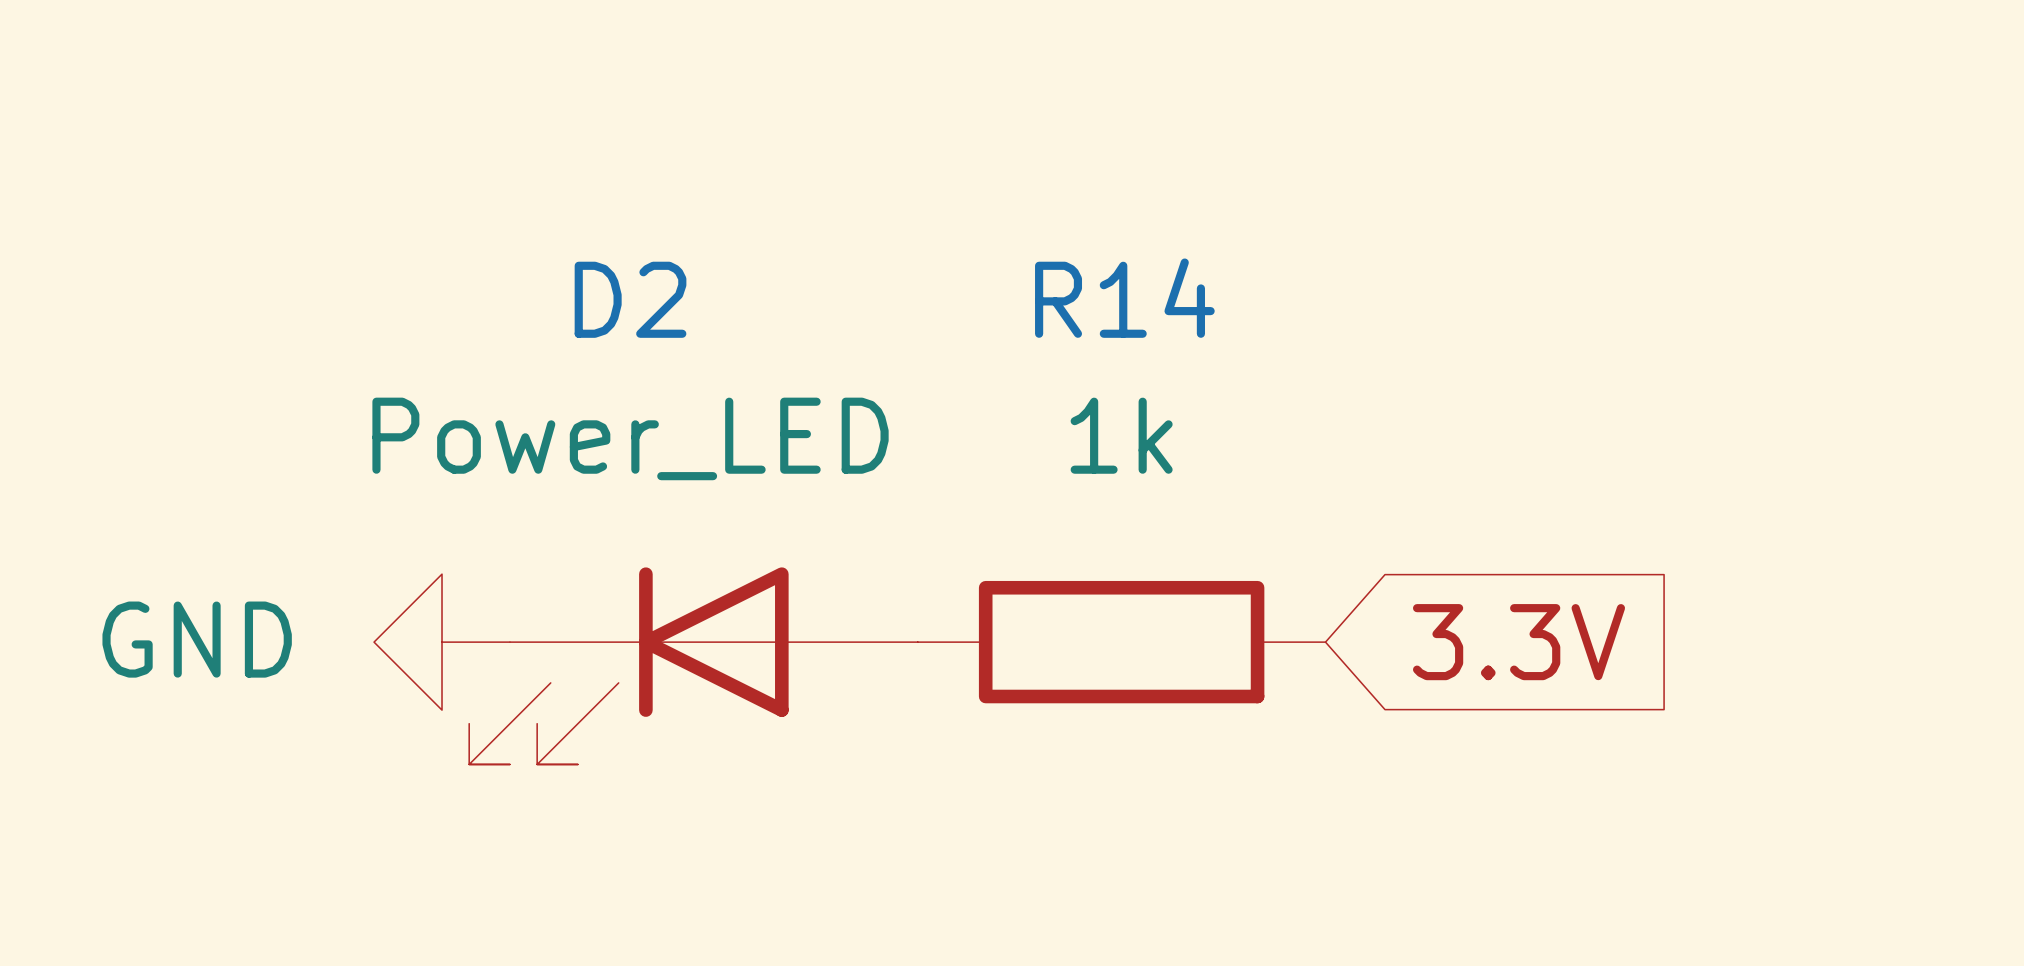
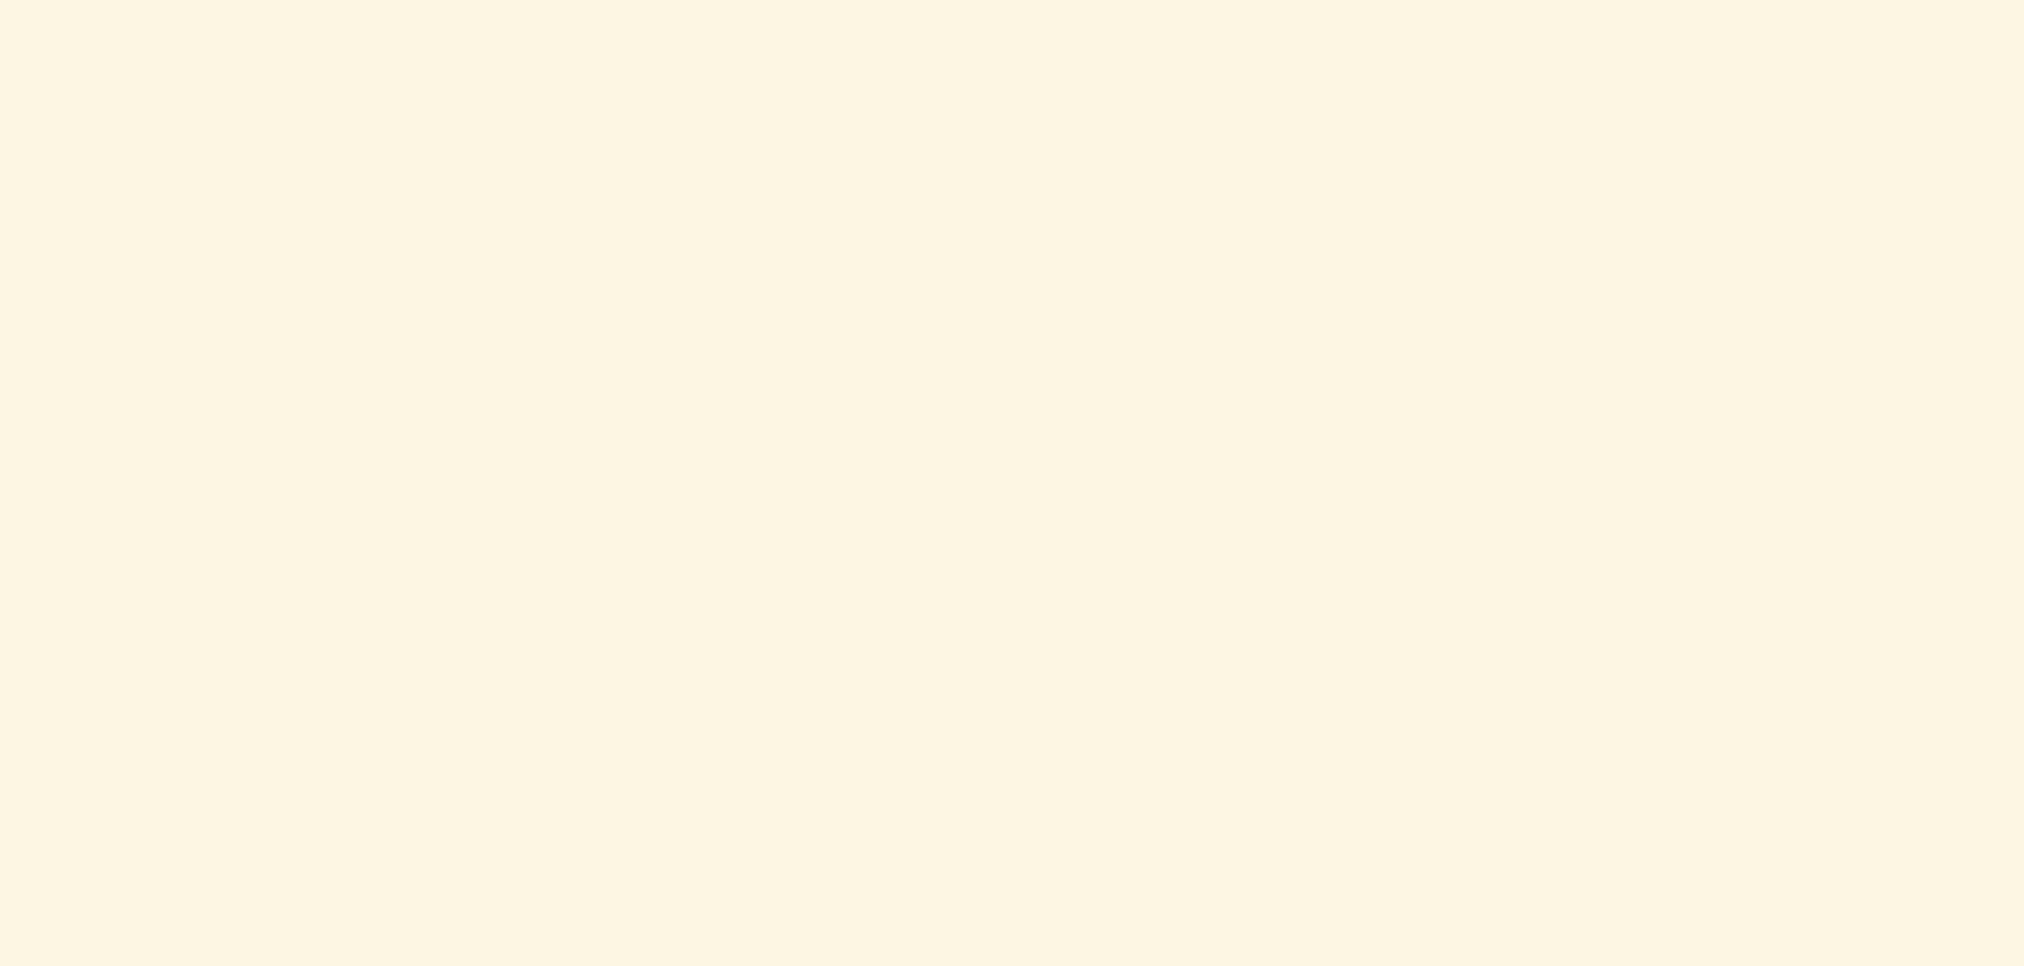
power symbol: GND (442, 642) -> none
R14: 1k (1121, 642) -> none
global label: 3.3V (1519, 642) -> none
D2: Power_LED (693, 665) -> none

